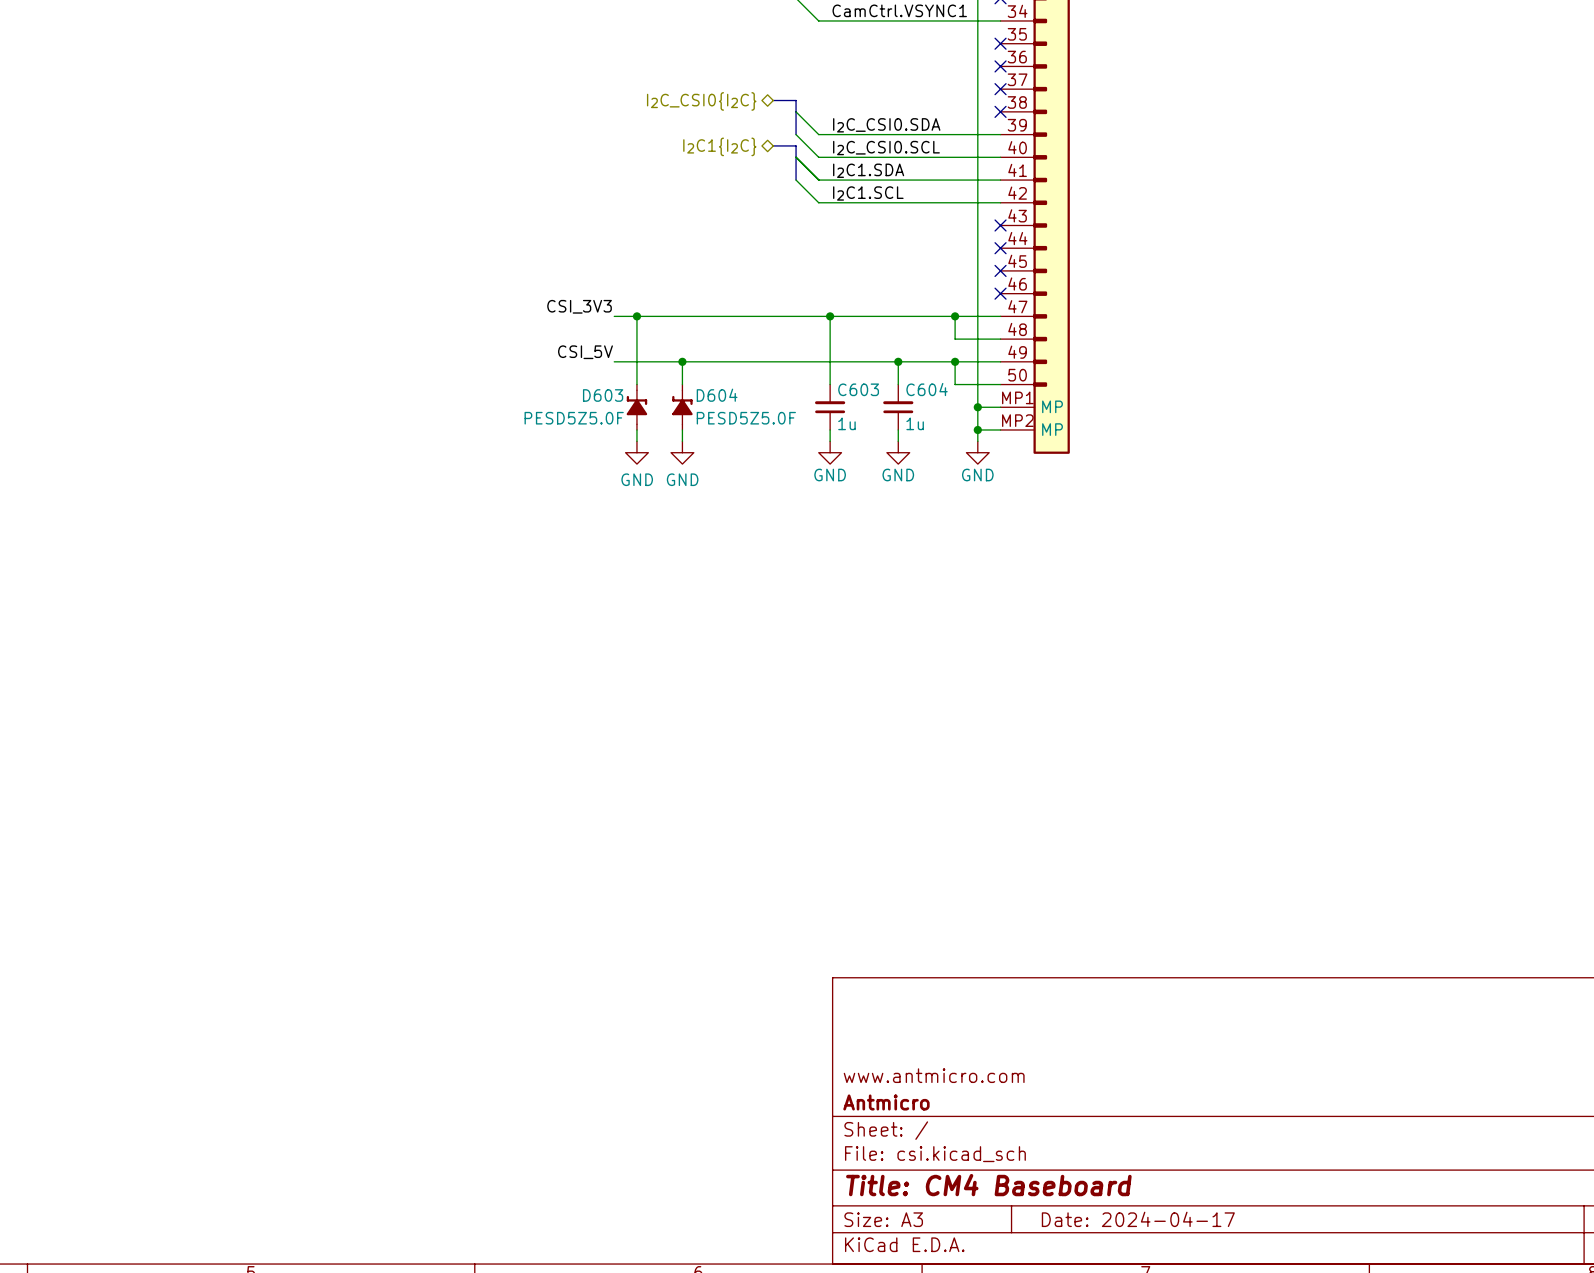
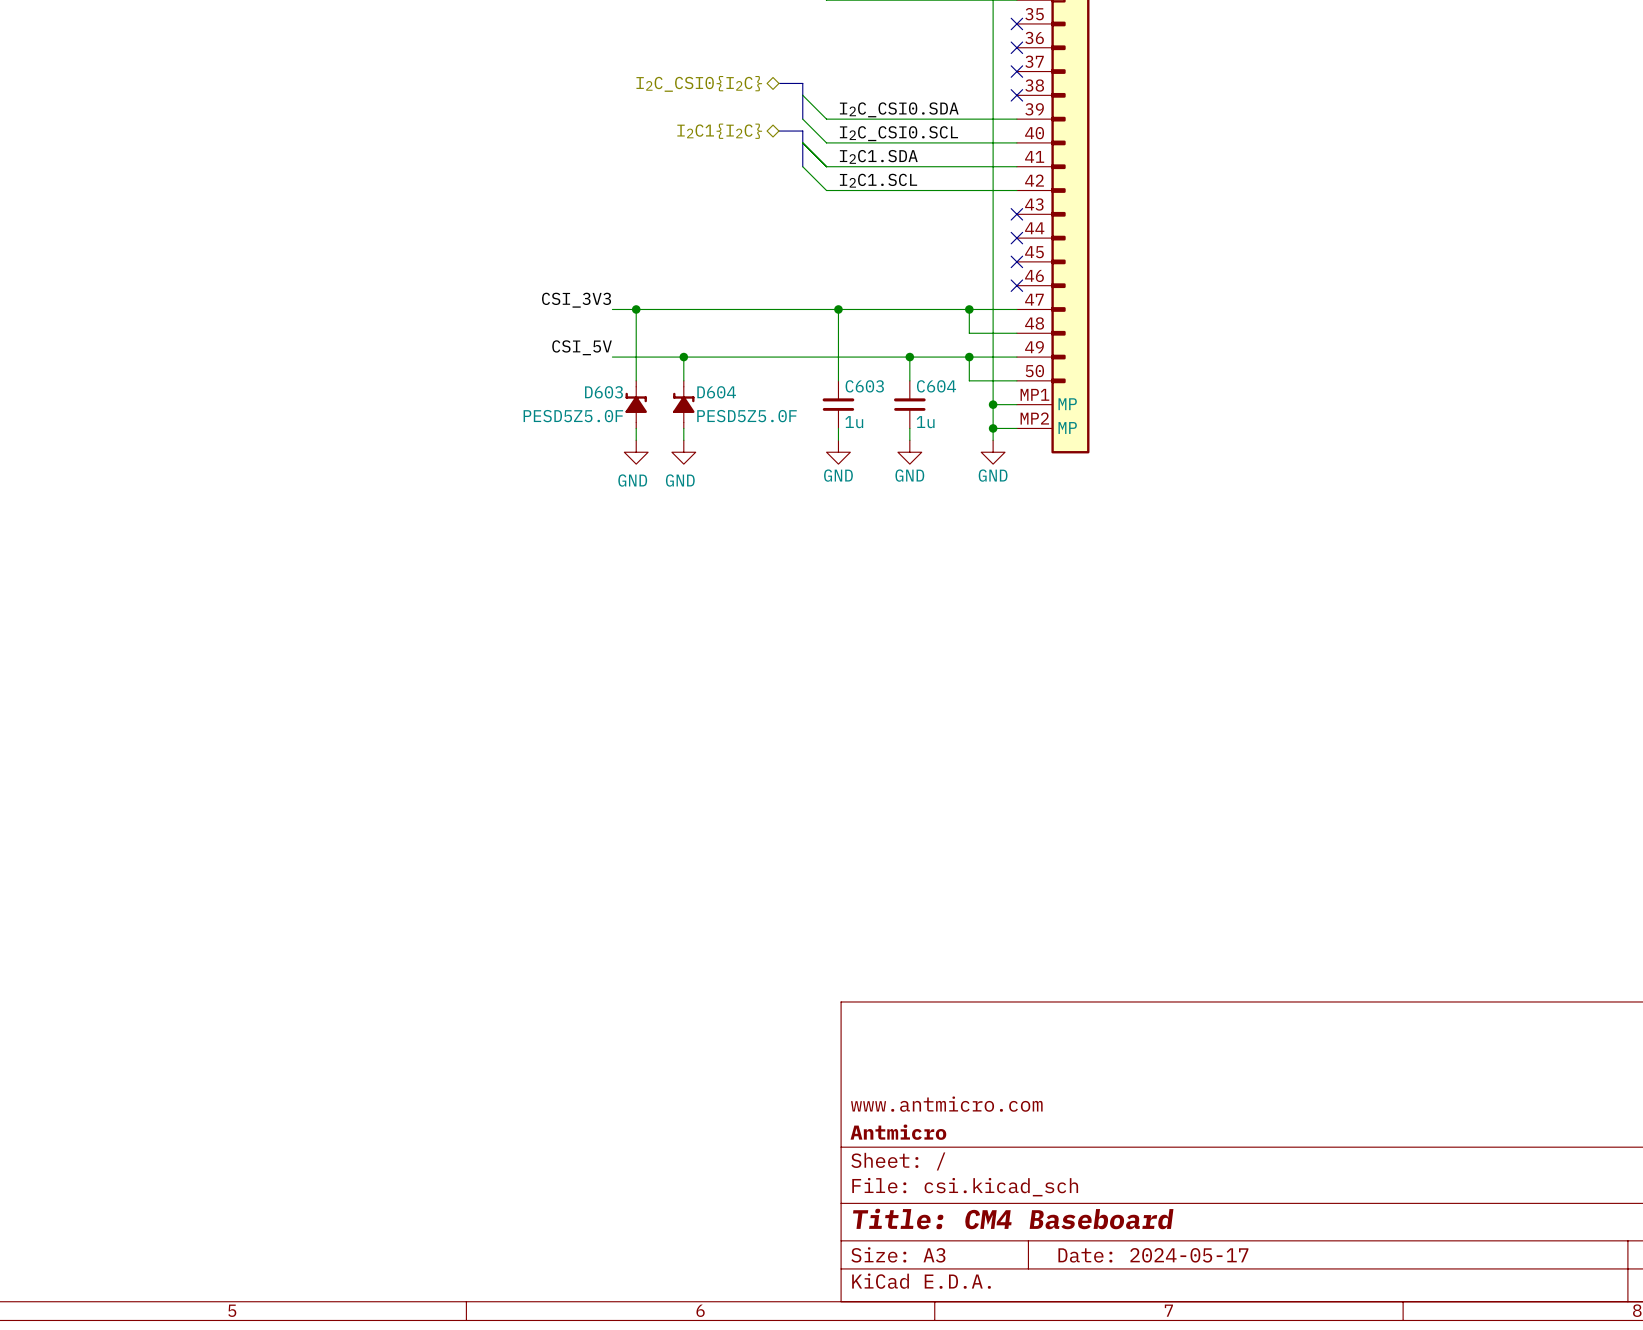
title block: Date: 2024-04-17 (1138, 1219) -> Date: 2024-05-17 (1153, 1255)

